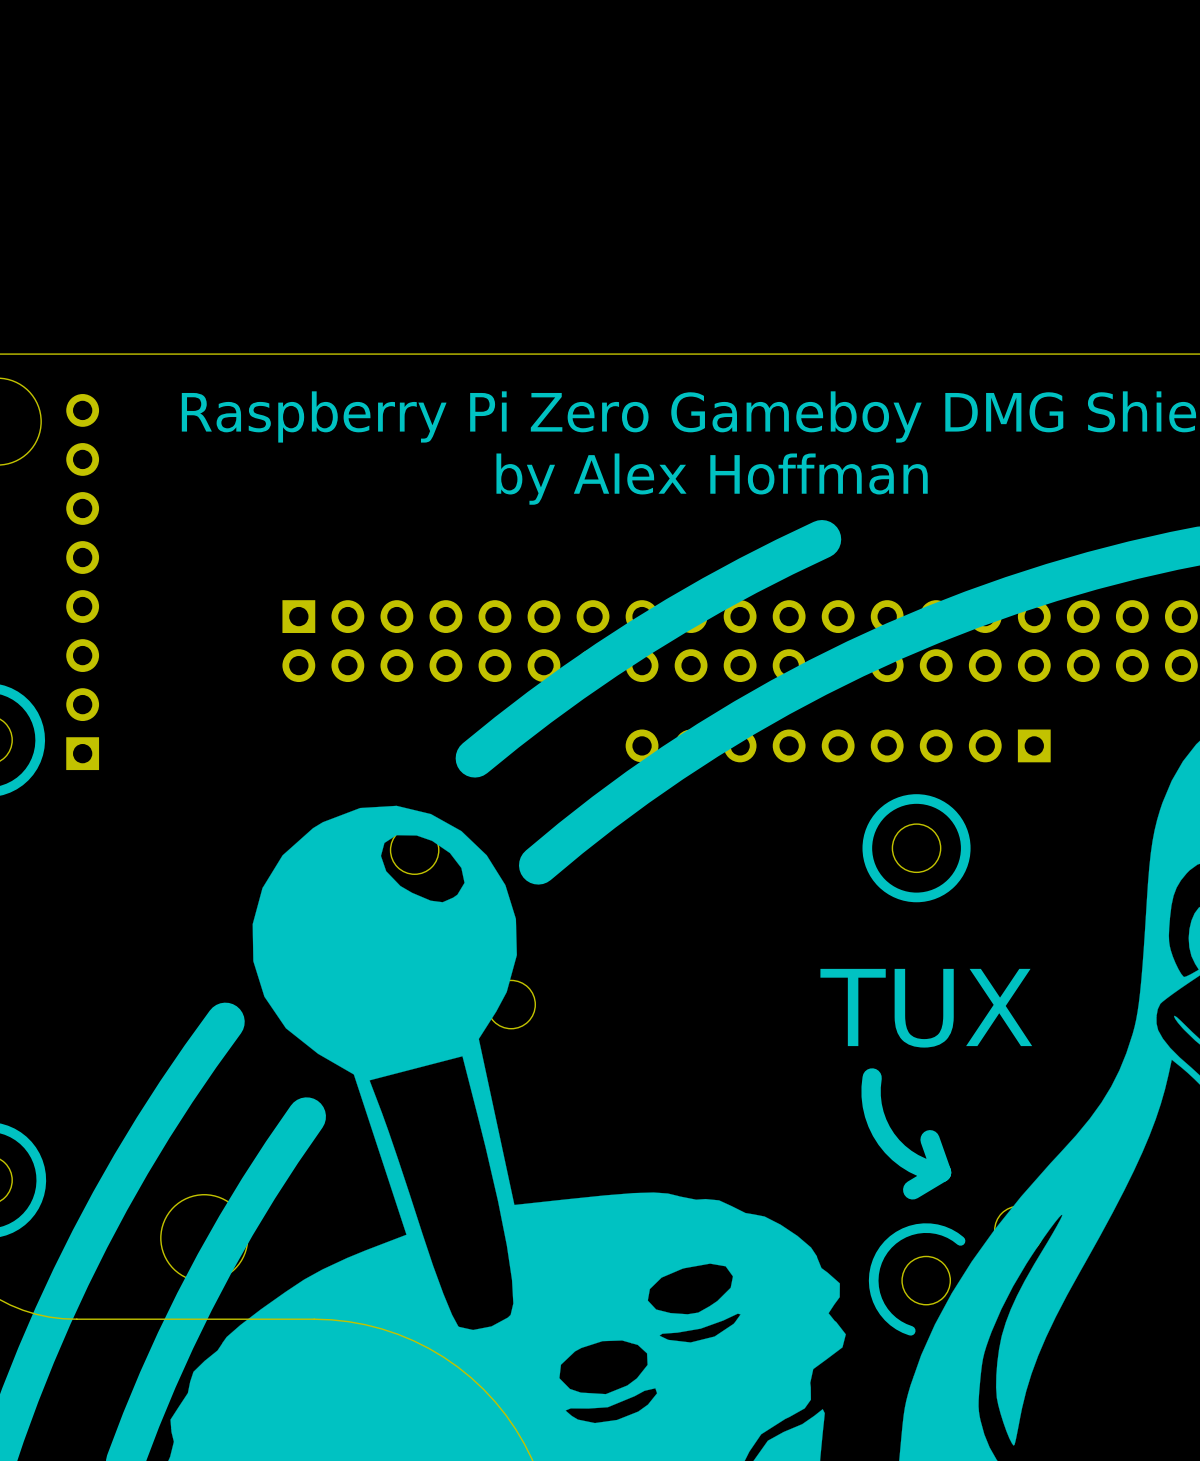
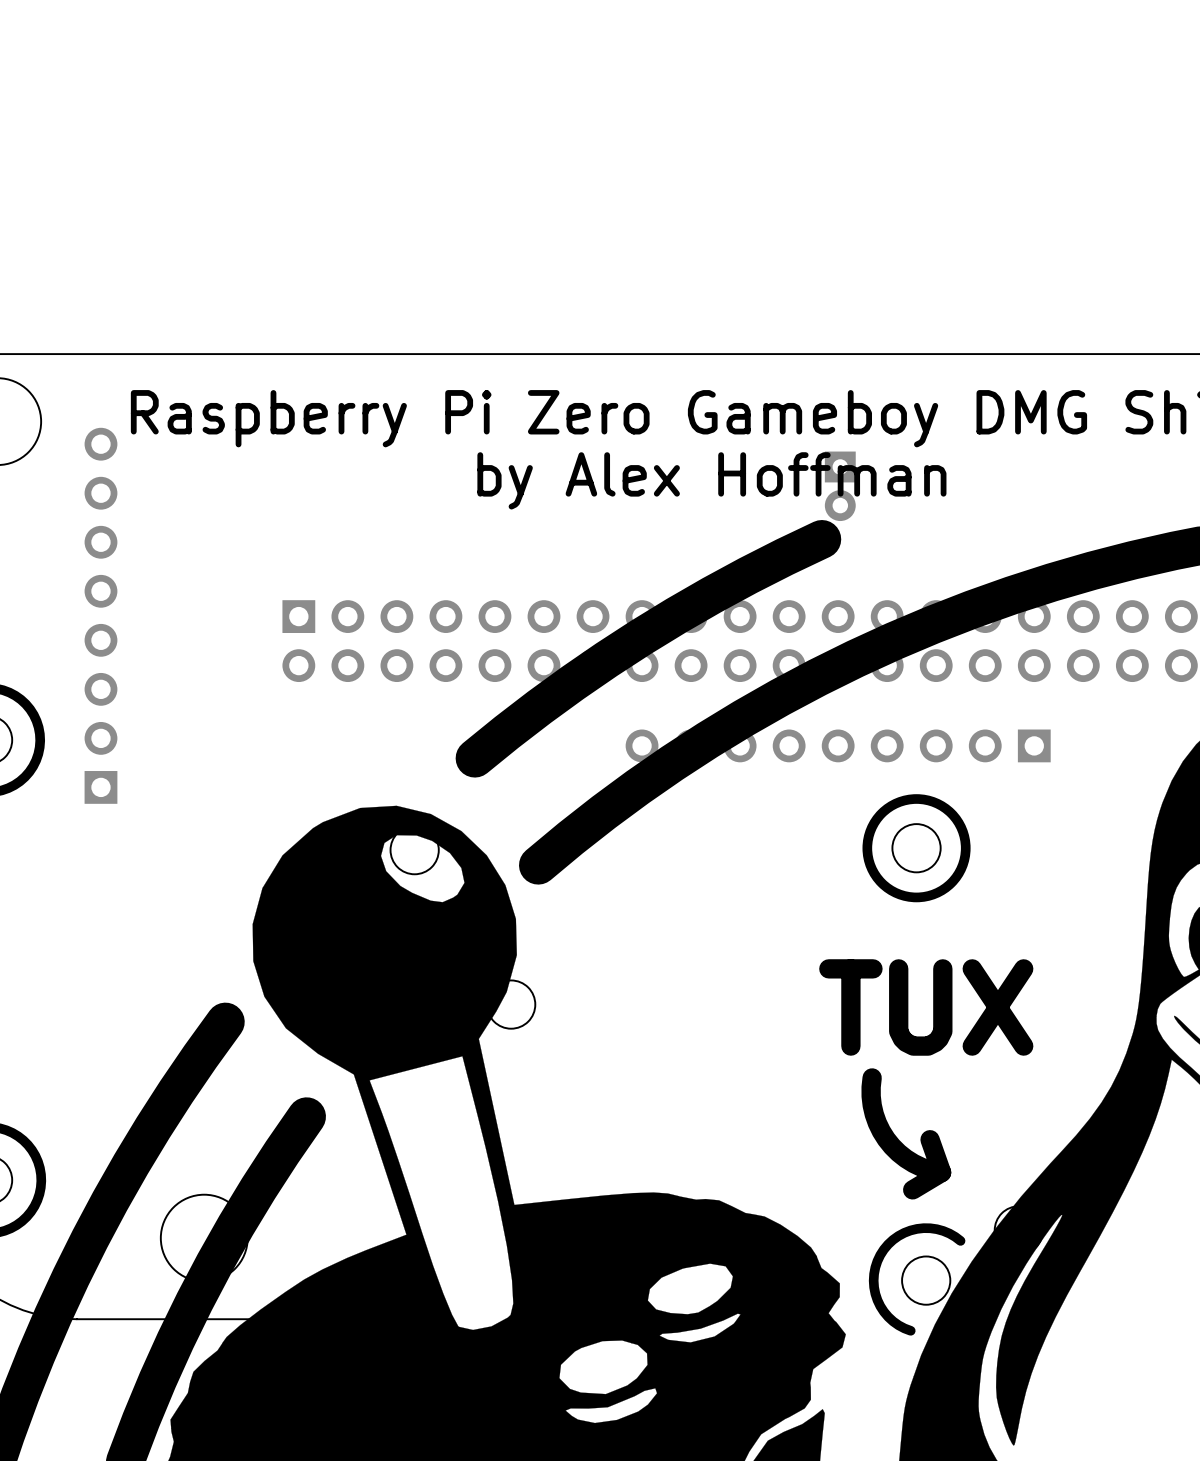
part: none -> (840, 486)
part position: (82, 582) -> (100, 615)

